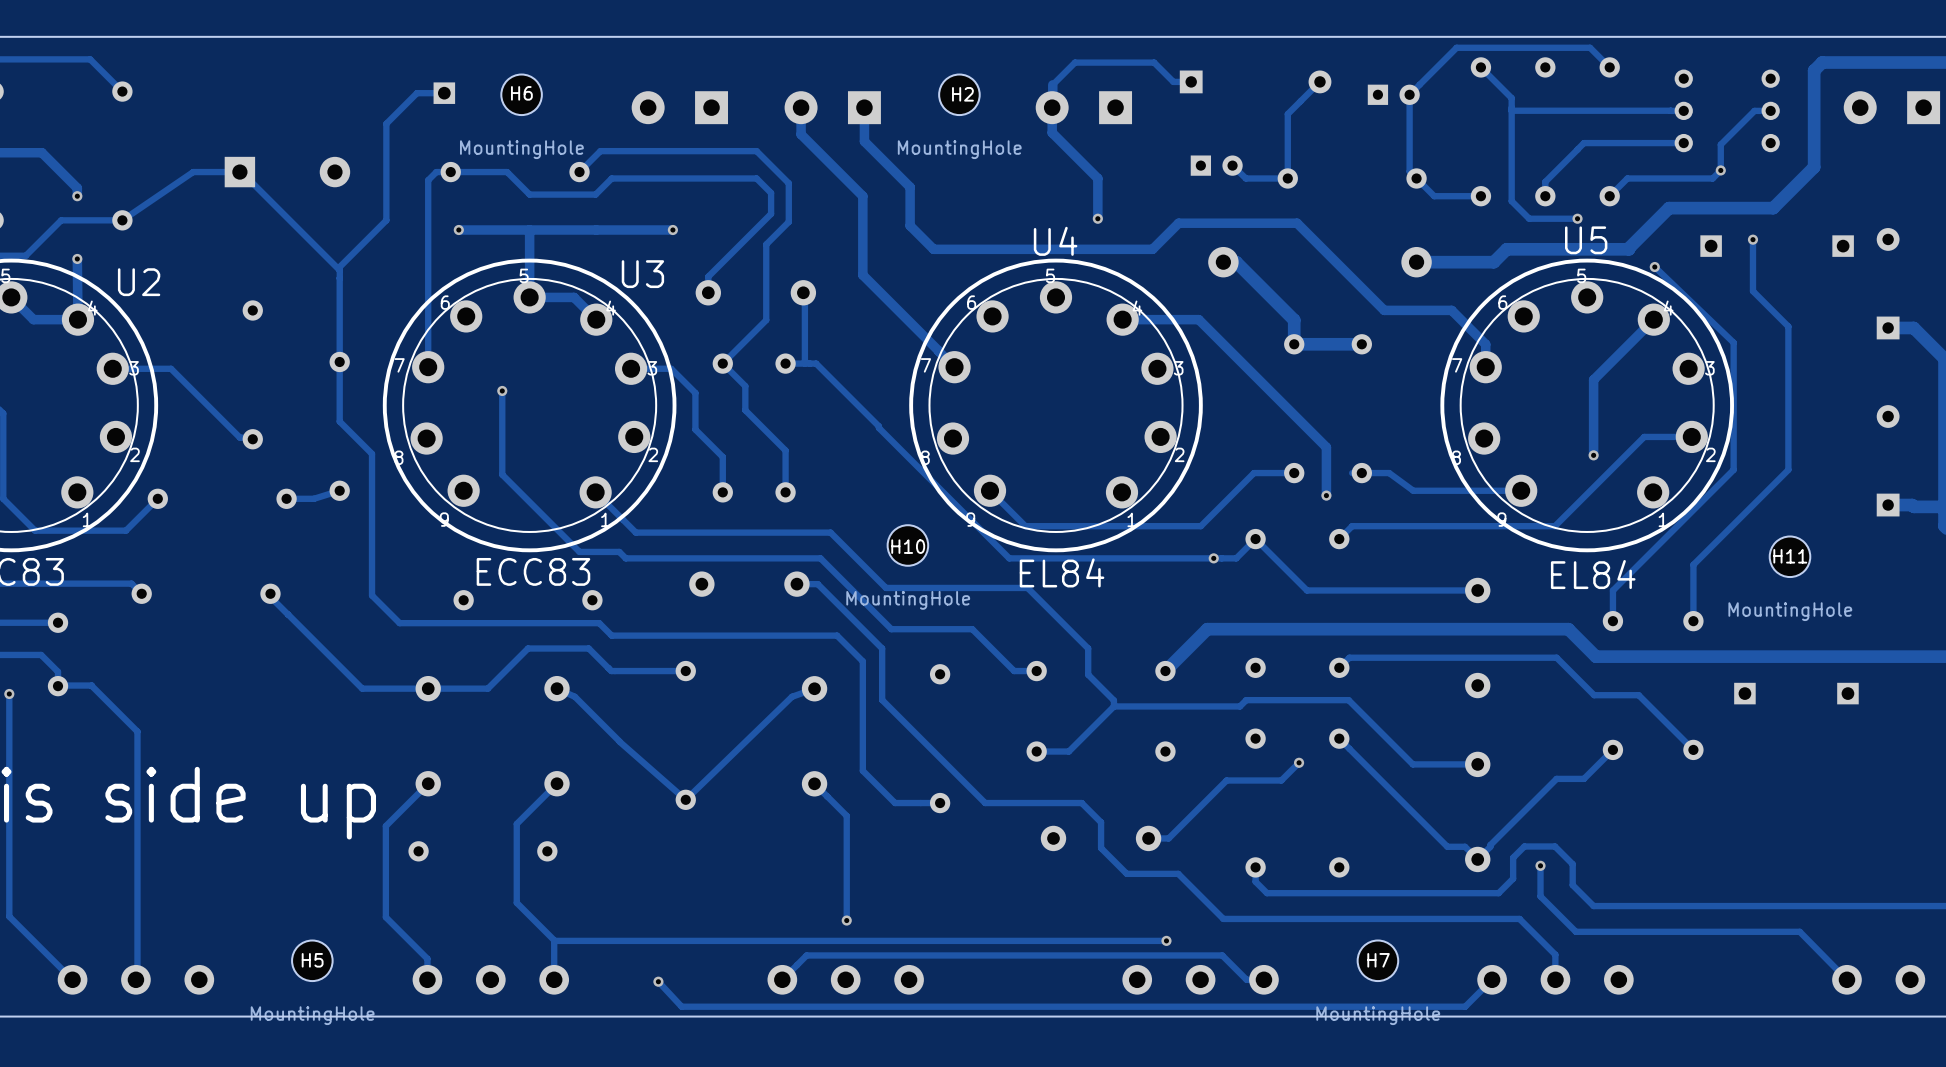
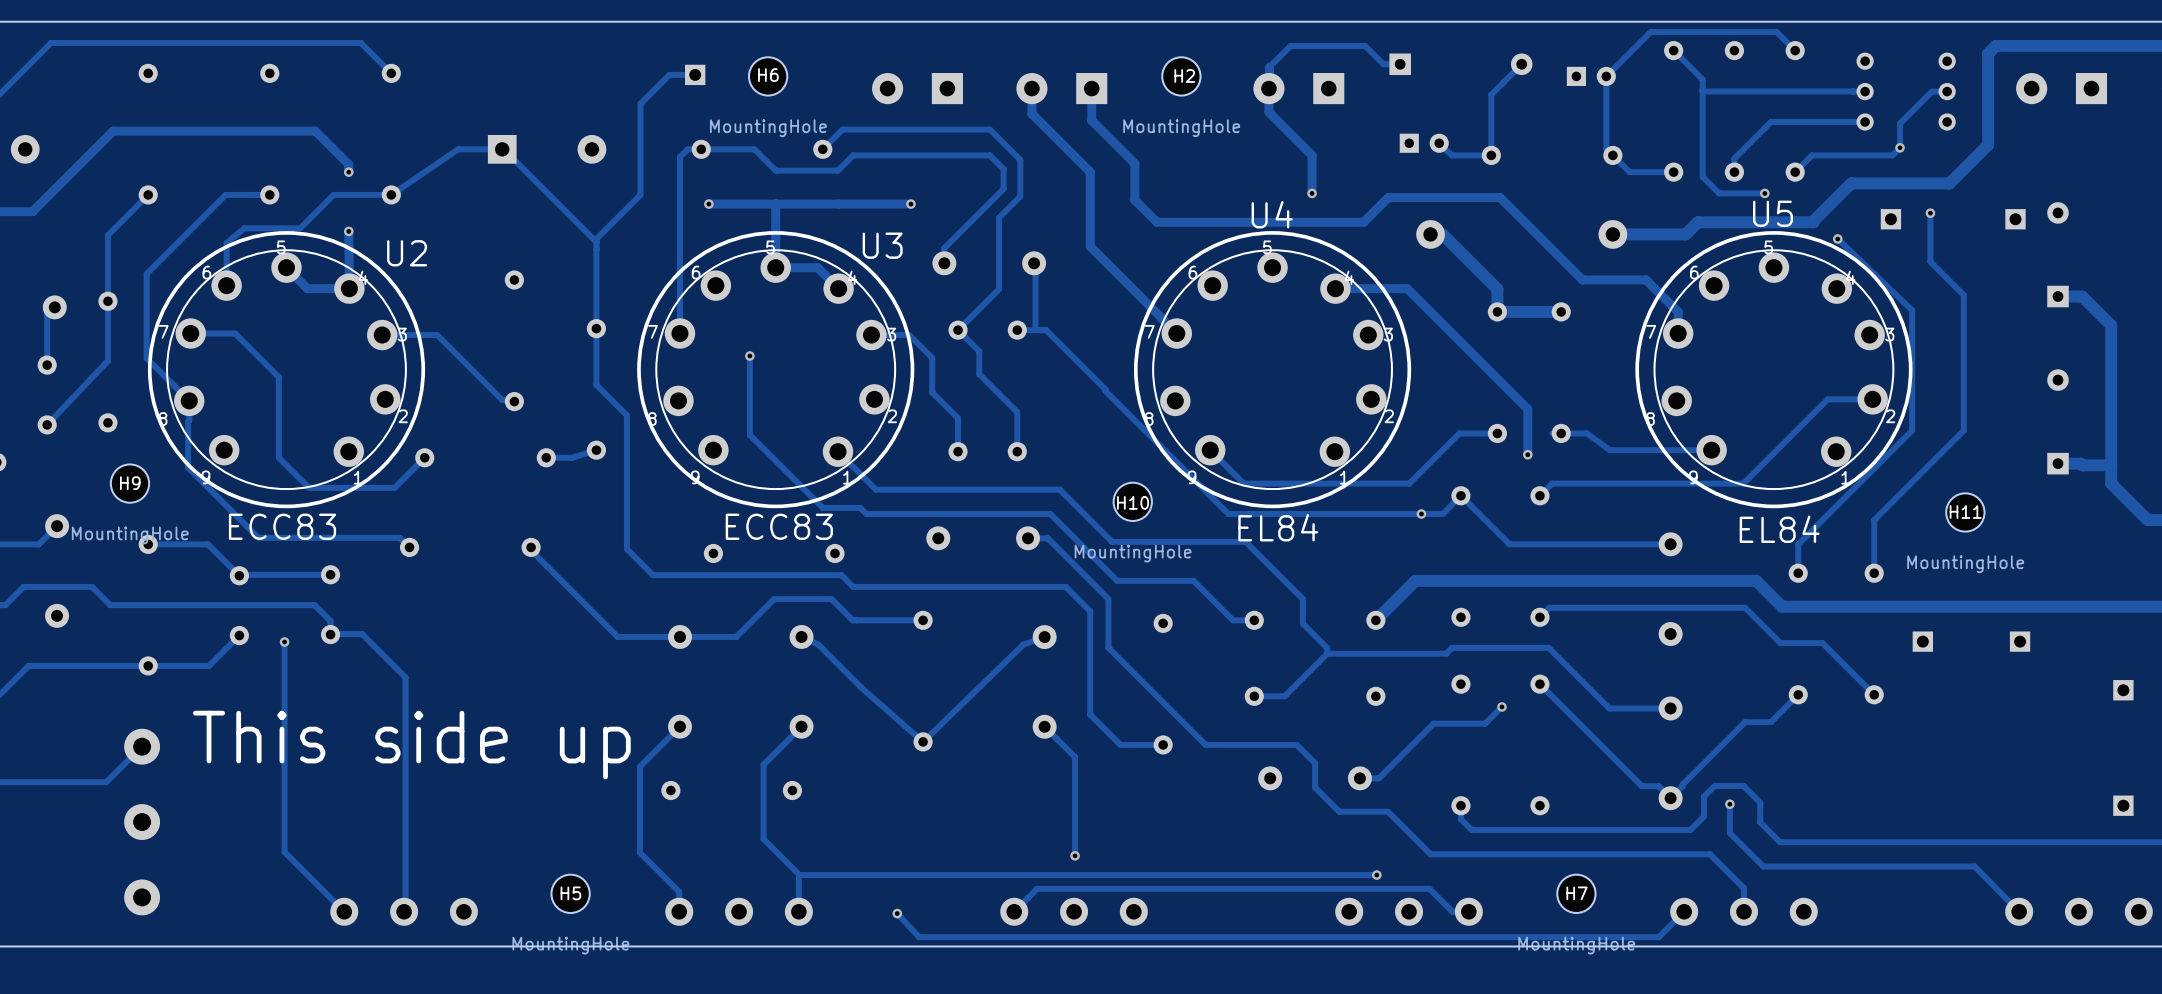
track: (1653, 319) (1593, 379) (1593, 455) -> none
via: (1593, 455) -> none

